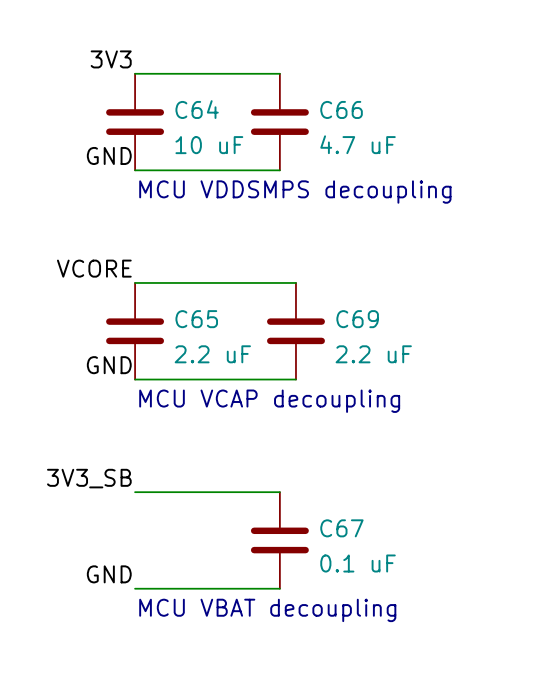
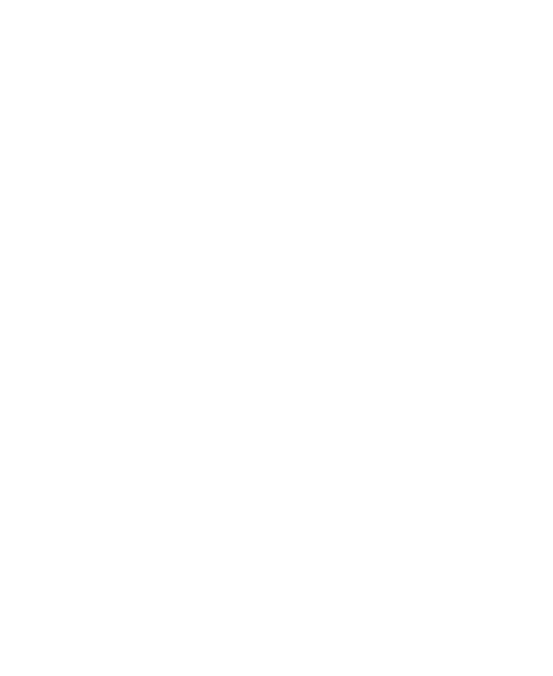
label: 3V3 (111, 59) -> none
wire: (135, 73) (279, 73) -> none
C64: 10 uF (135, 122) -> none
C66: 4.7 uF (279, 122) -> none
label: GND (109, 155) -> none
wire: (135, 170) (279, 170) -> none
text: MCU VDDSMPS decoupling (295, 192) -> none
label: VCORE (94, 268) -> none
wire: (135, 282) (295, 282) -> none
C65: 2.2 uF (135, 331) -> none
C69: 2.2 uF (295, 331) -> none
label: GND (109, 365) -> none
wire: (135, 379) (295, 379) -> none
text: MCU VCAP decoupling (269, 401) -> none
label: 3V3_SB (89, 478) -> none
wire: (135, 492) (279, 492) -> none
C67: 0.1 uF (279, 540) -> none
label: GND (109, 574) -> none
wire: (135, 588) (279, 588) -> none
text: MCU VBAT decoupling (267, 610) -> none

